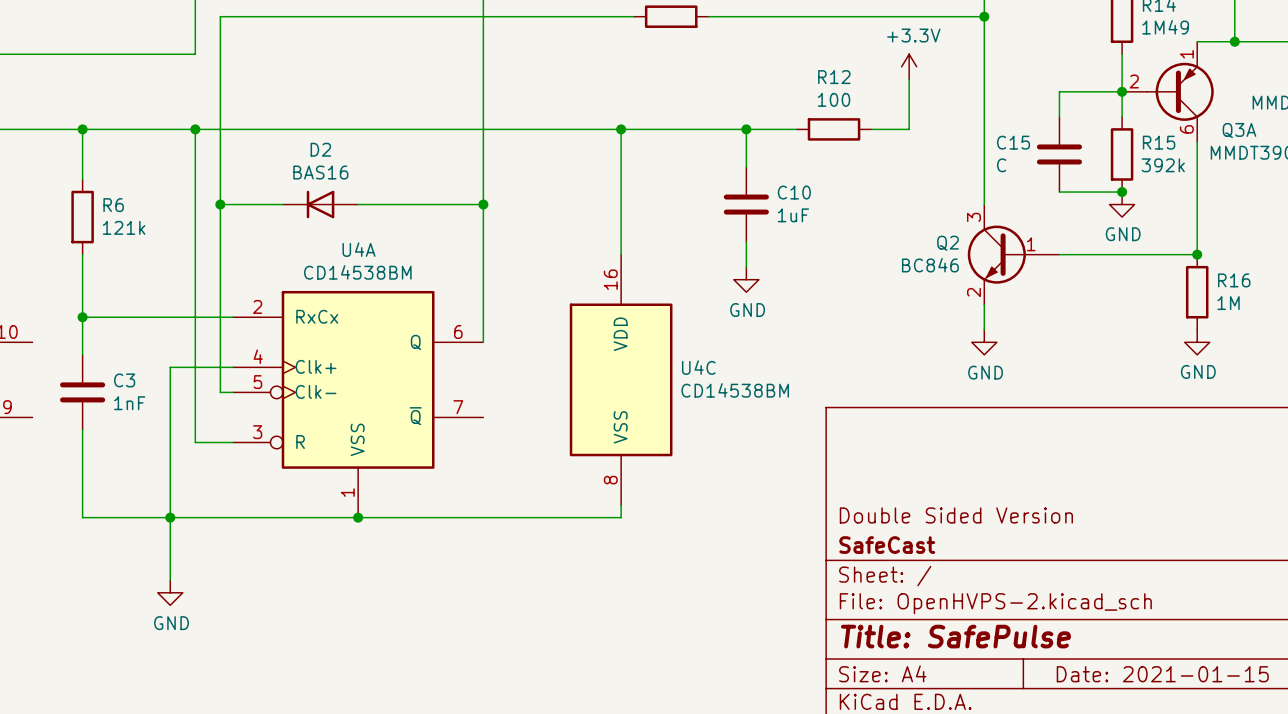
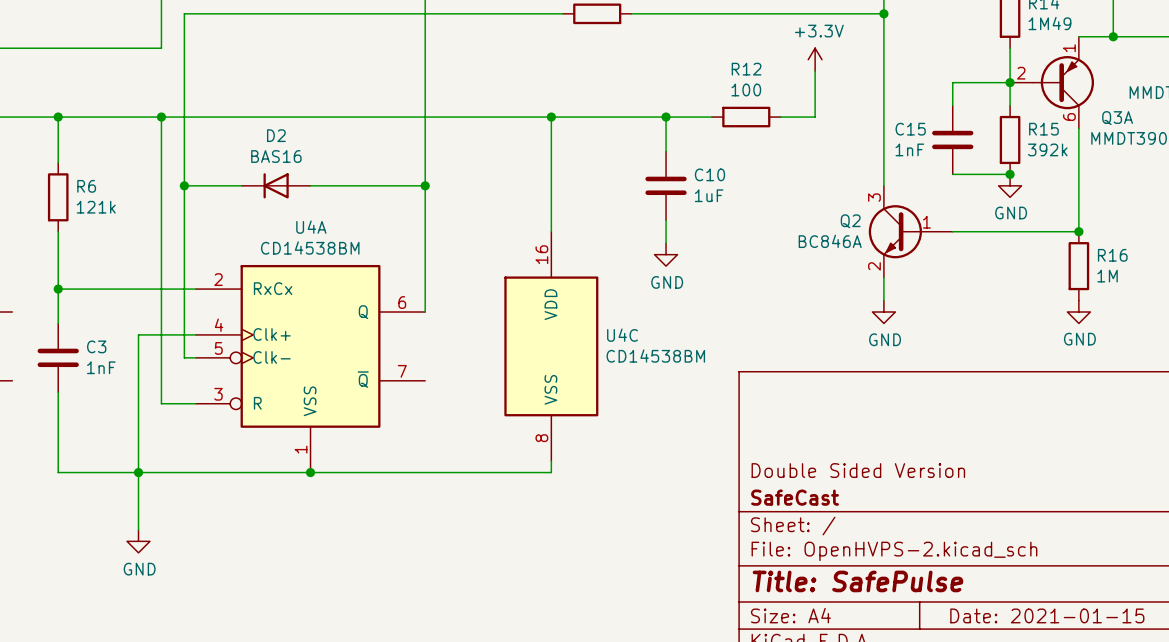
C15 value: C (1001, 165) -> 1nF (909, 149)
Q2 value: BC846 (930, 265) -> BC846A (830, 241)

